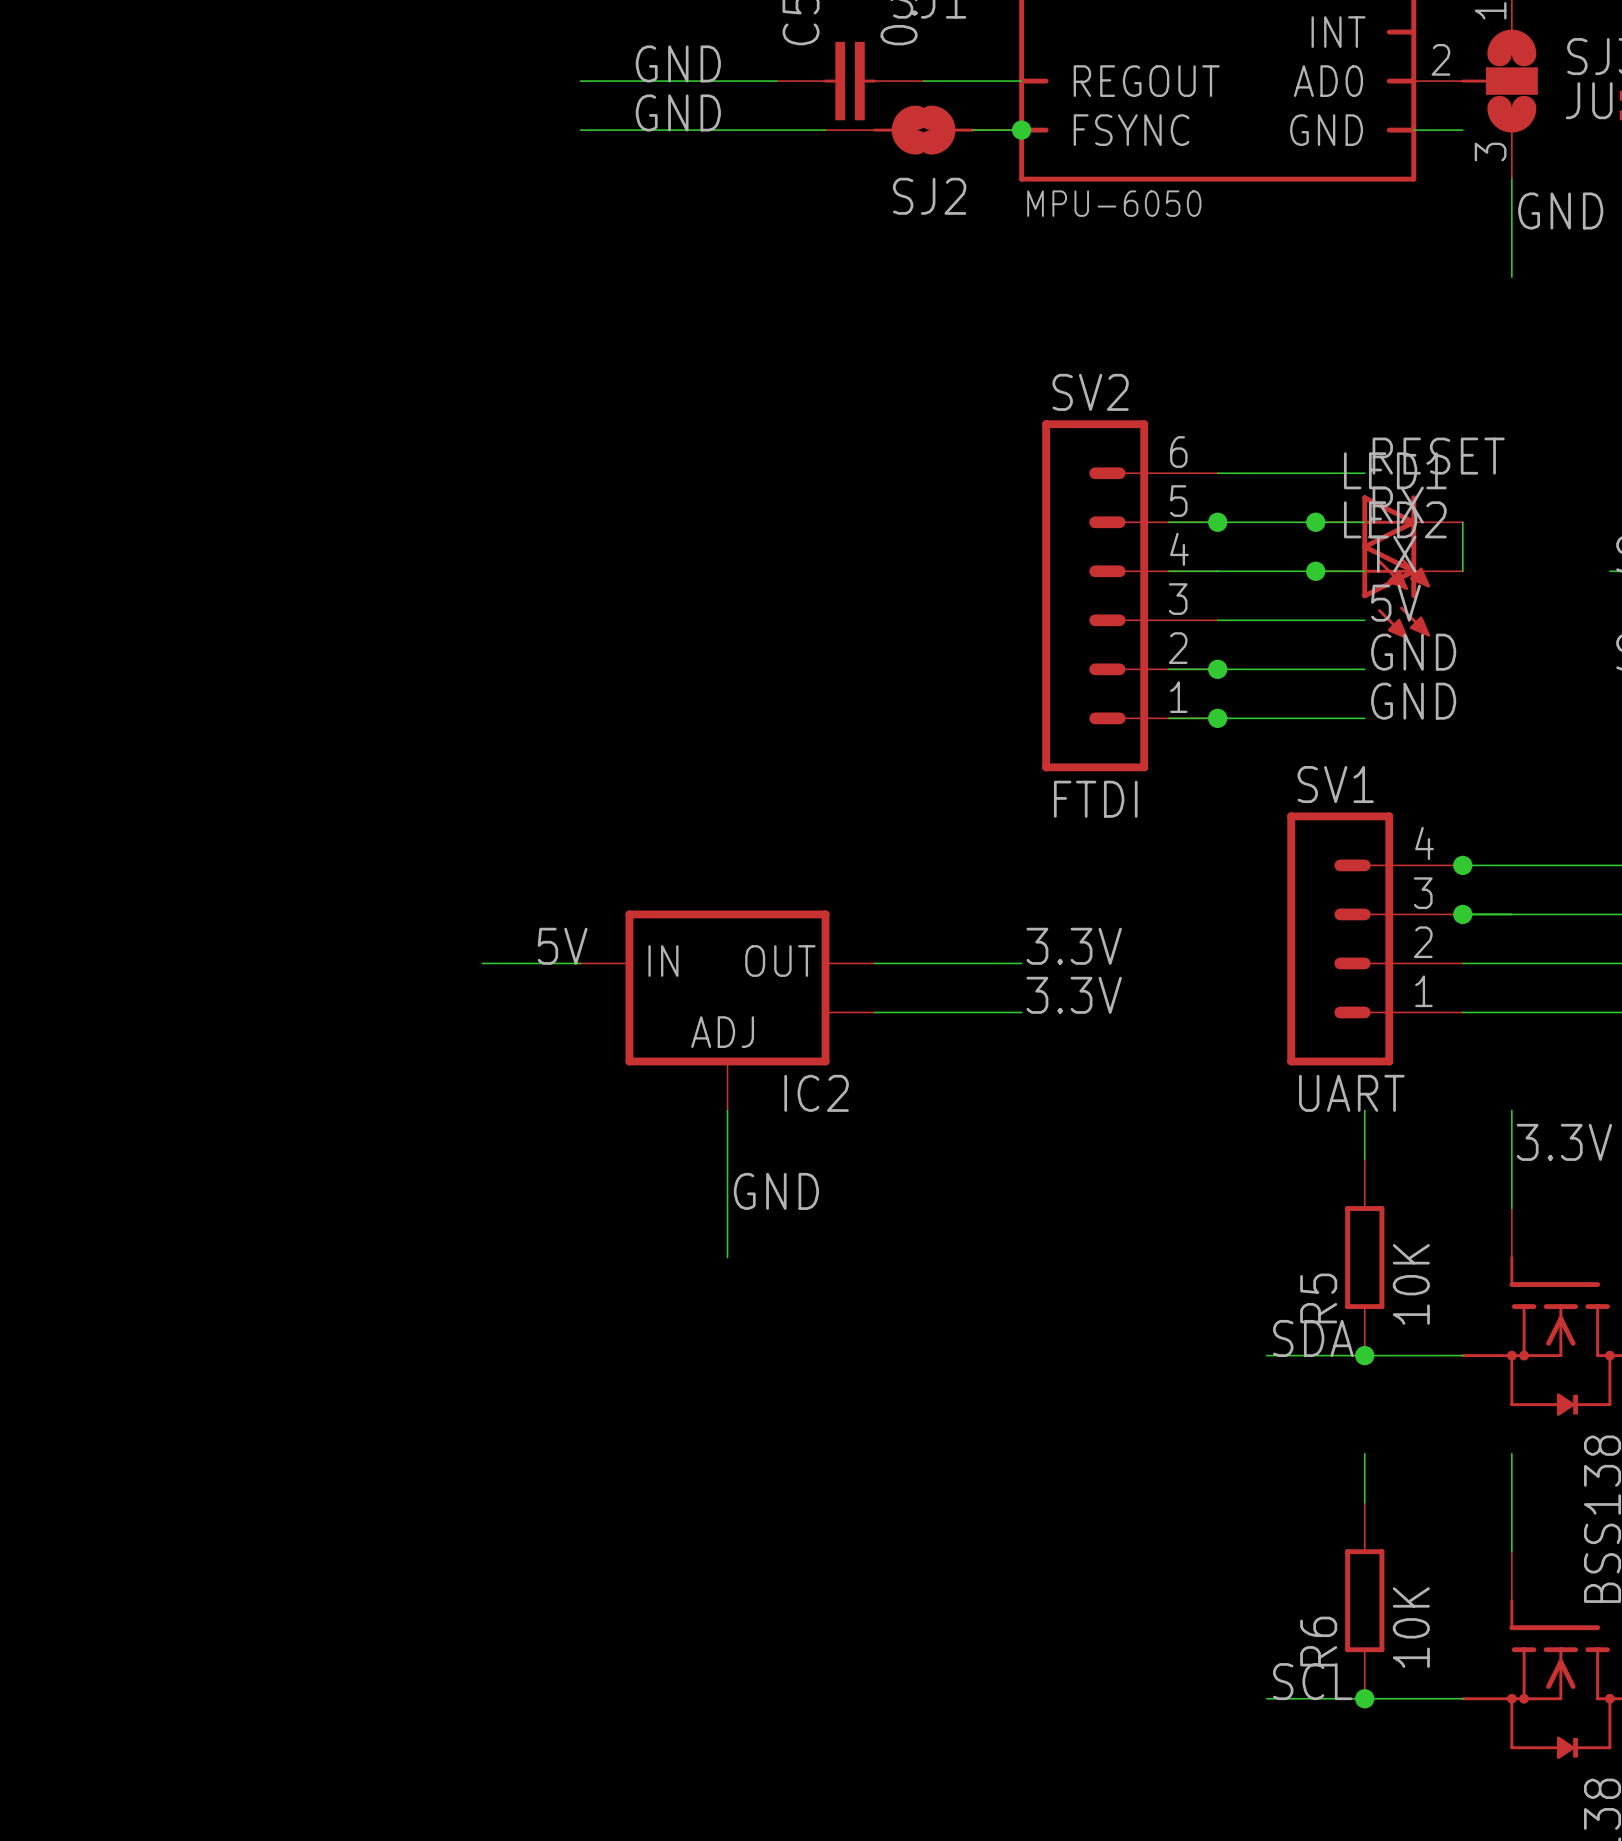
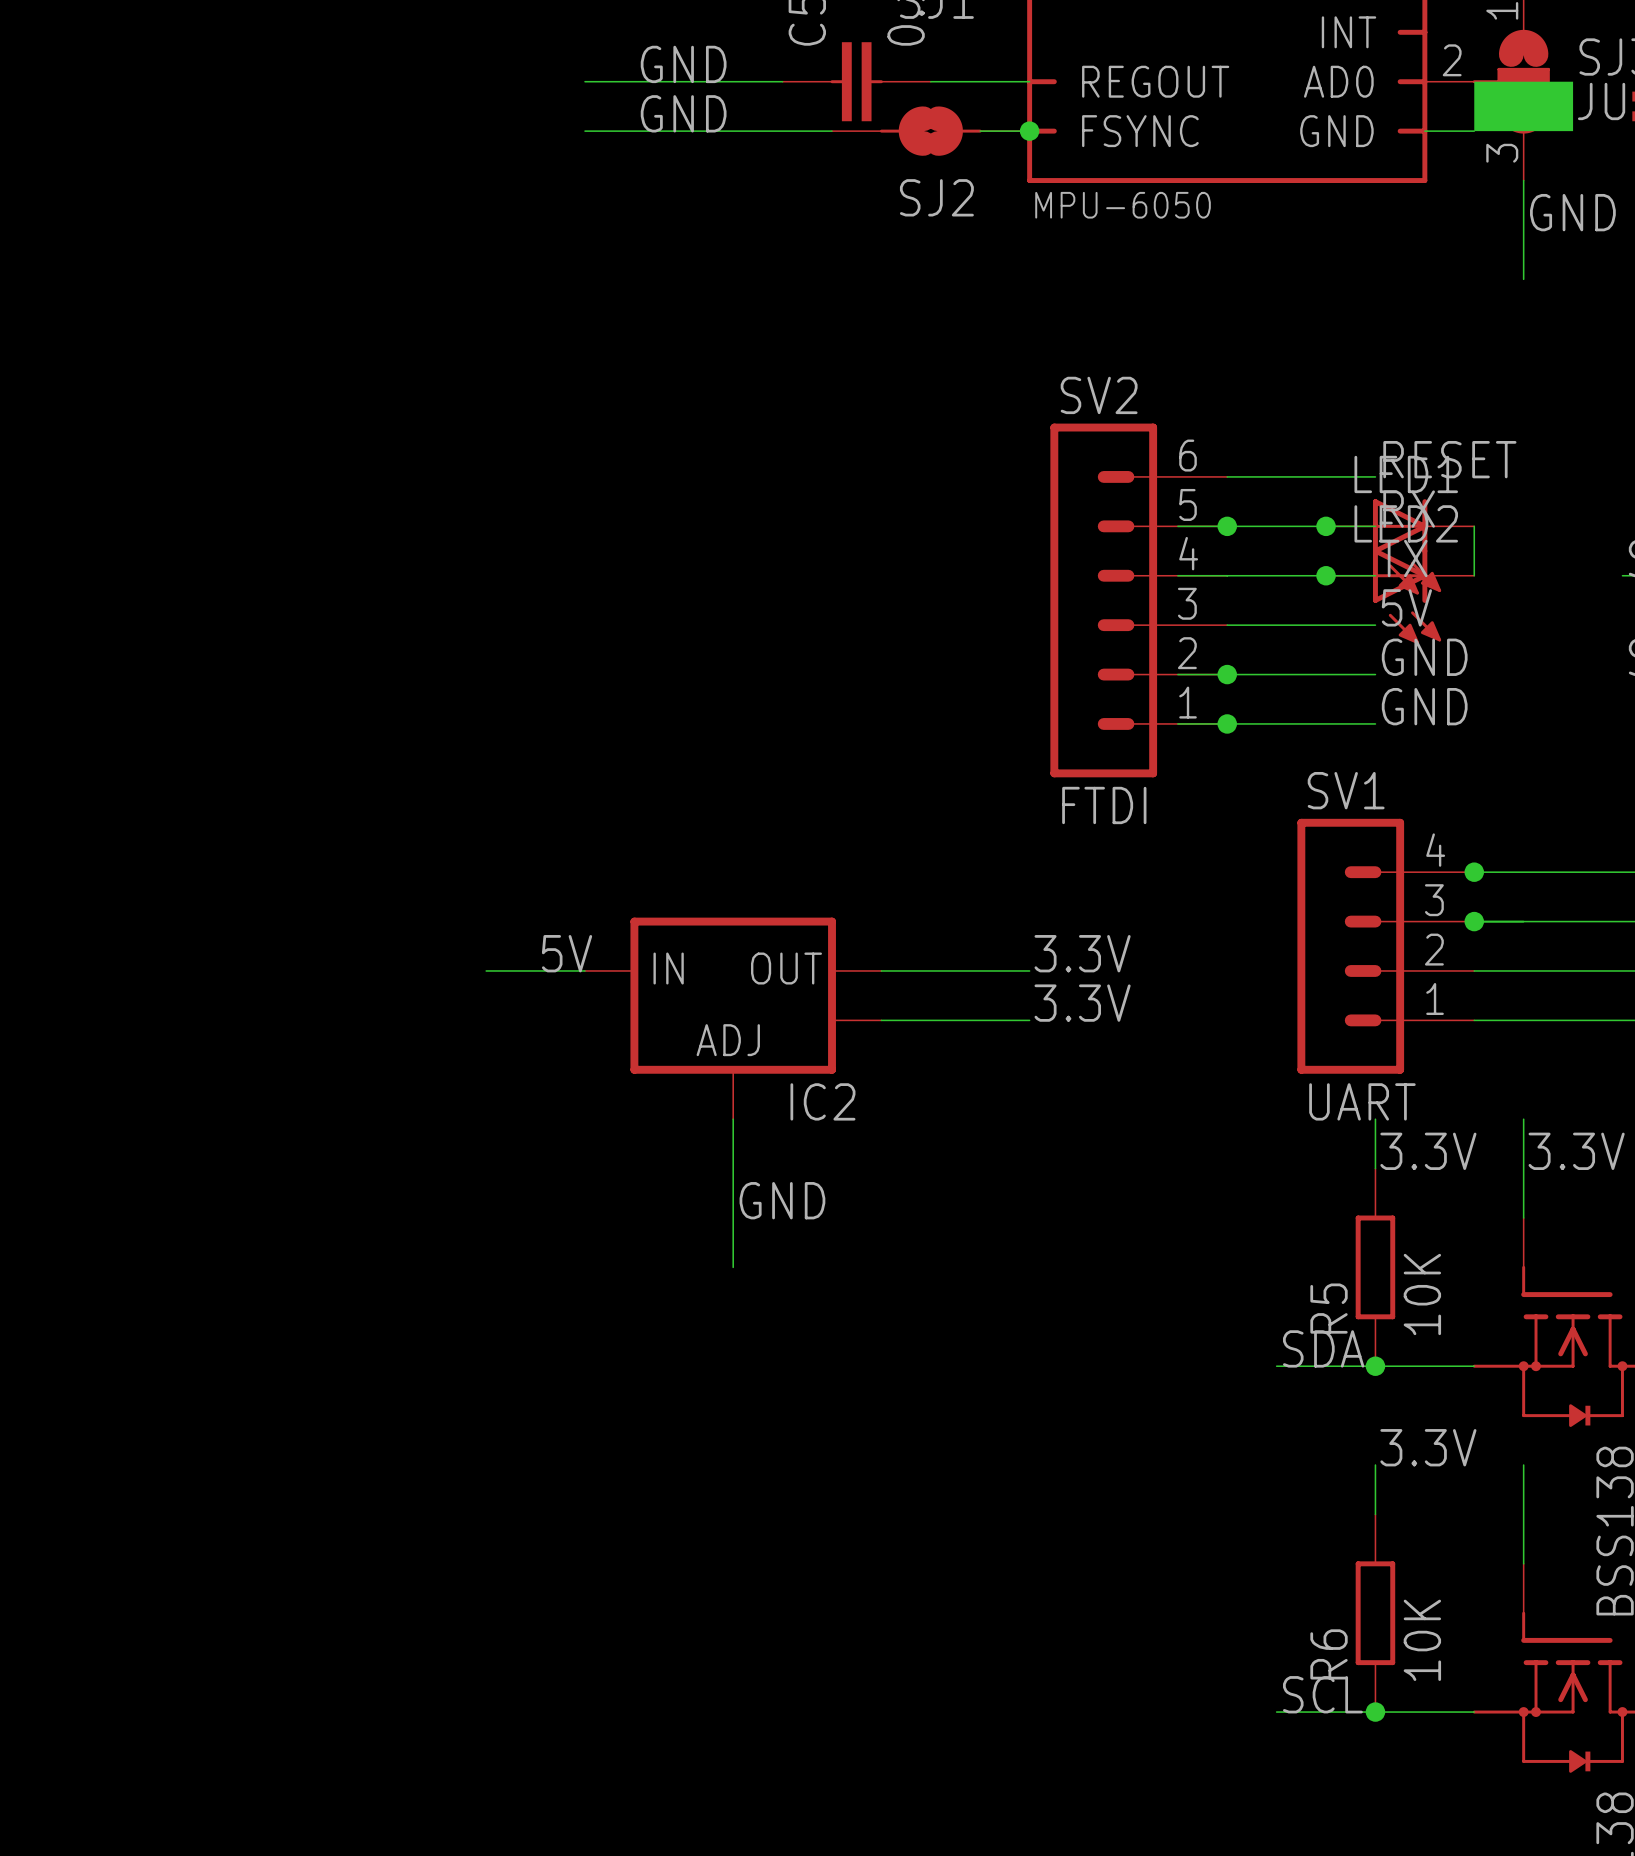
drawing: none -> [1474, 81, 1574, 132]
label: none -> 3.3V (1428, 1151)
label: none -> 3.3V (1428, 1447)

